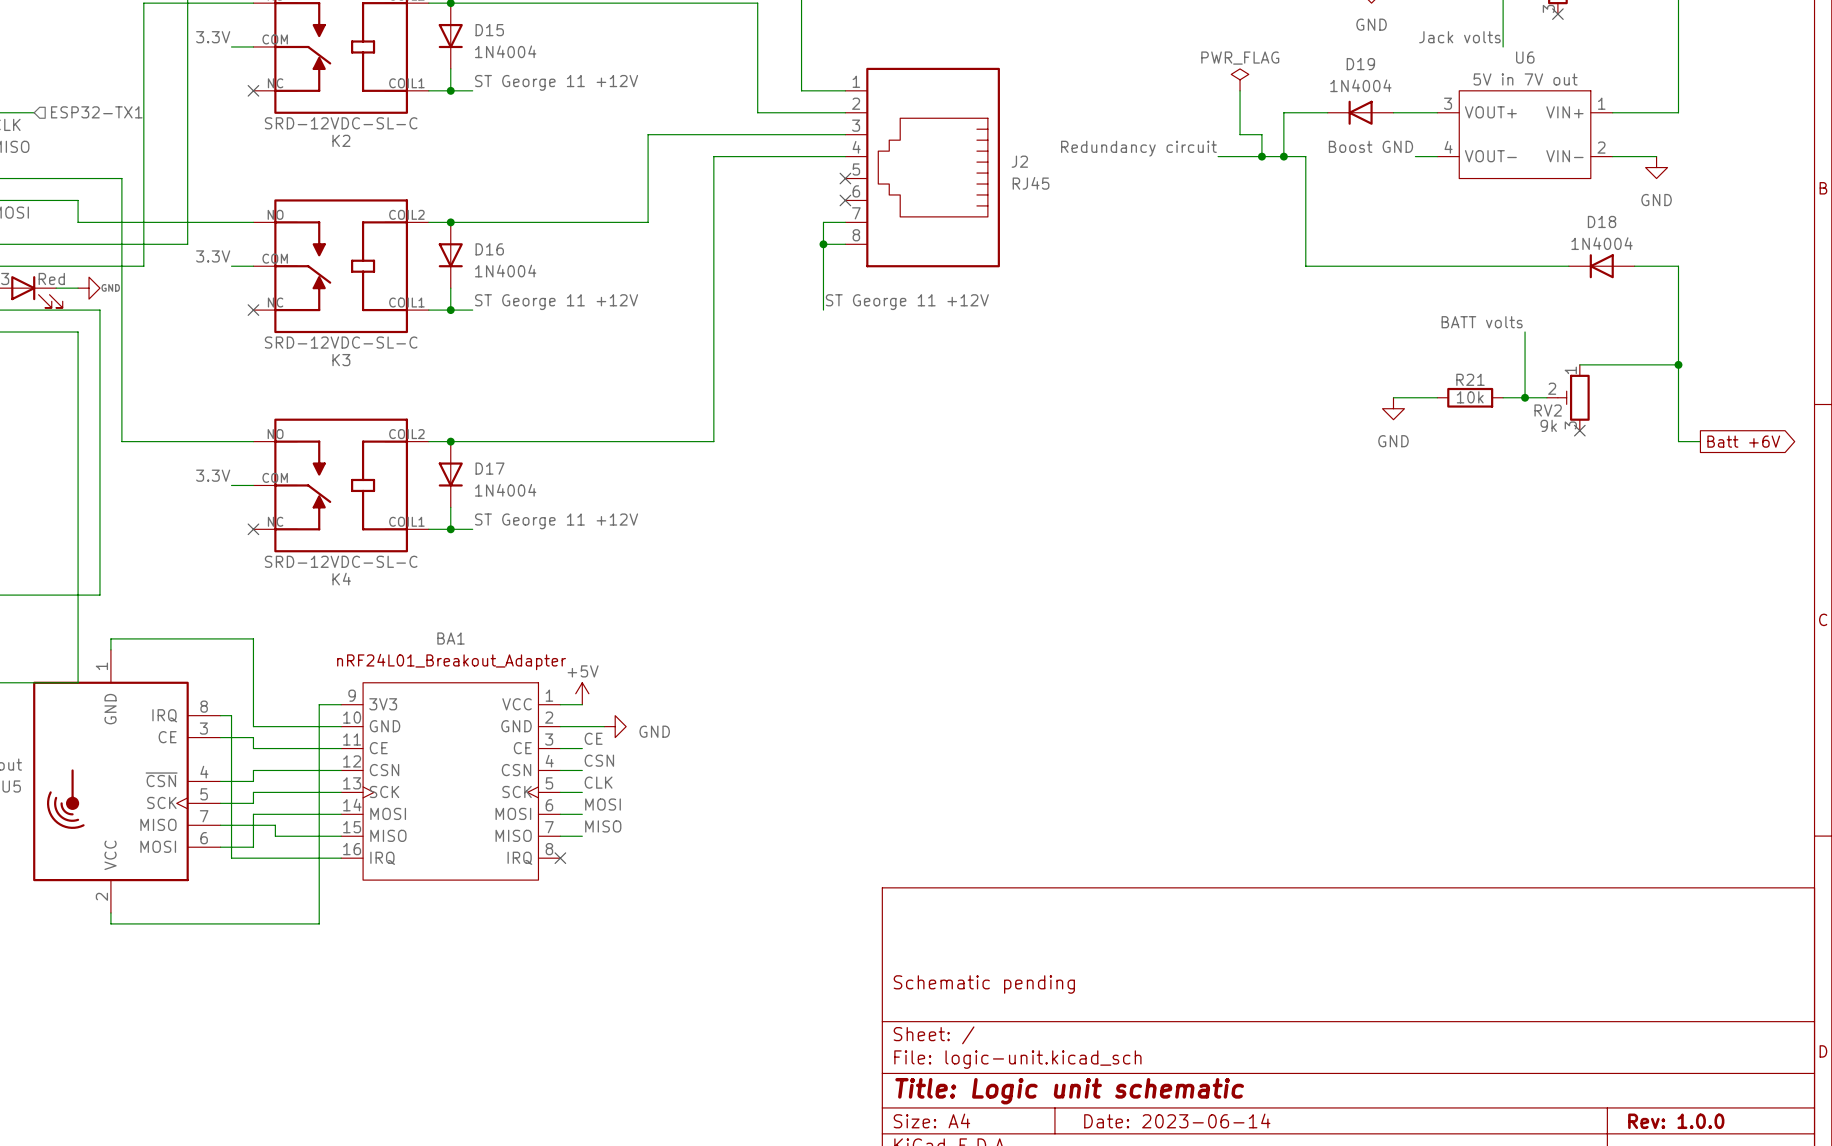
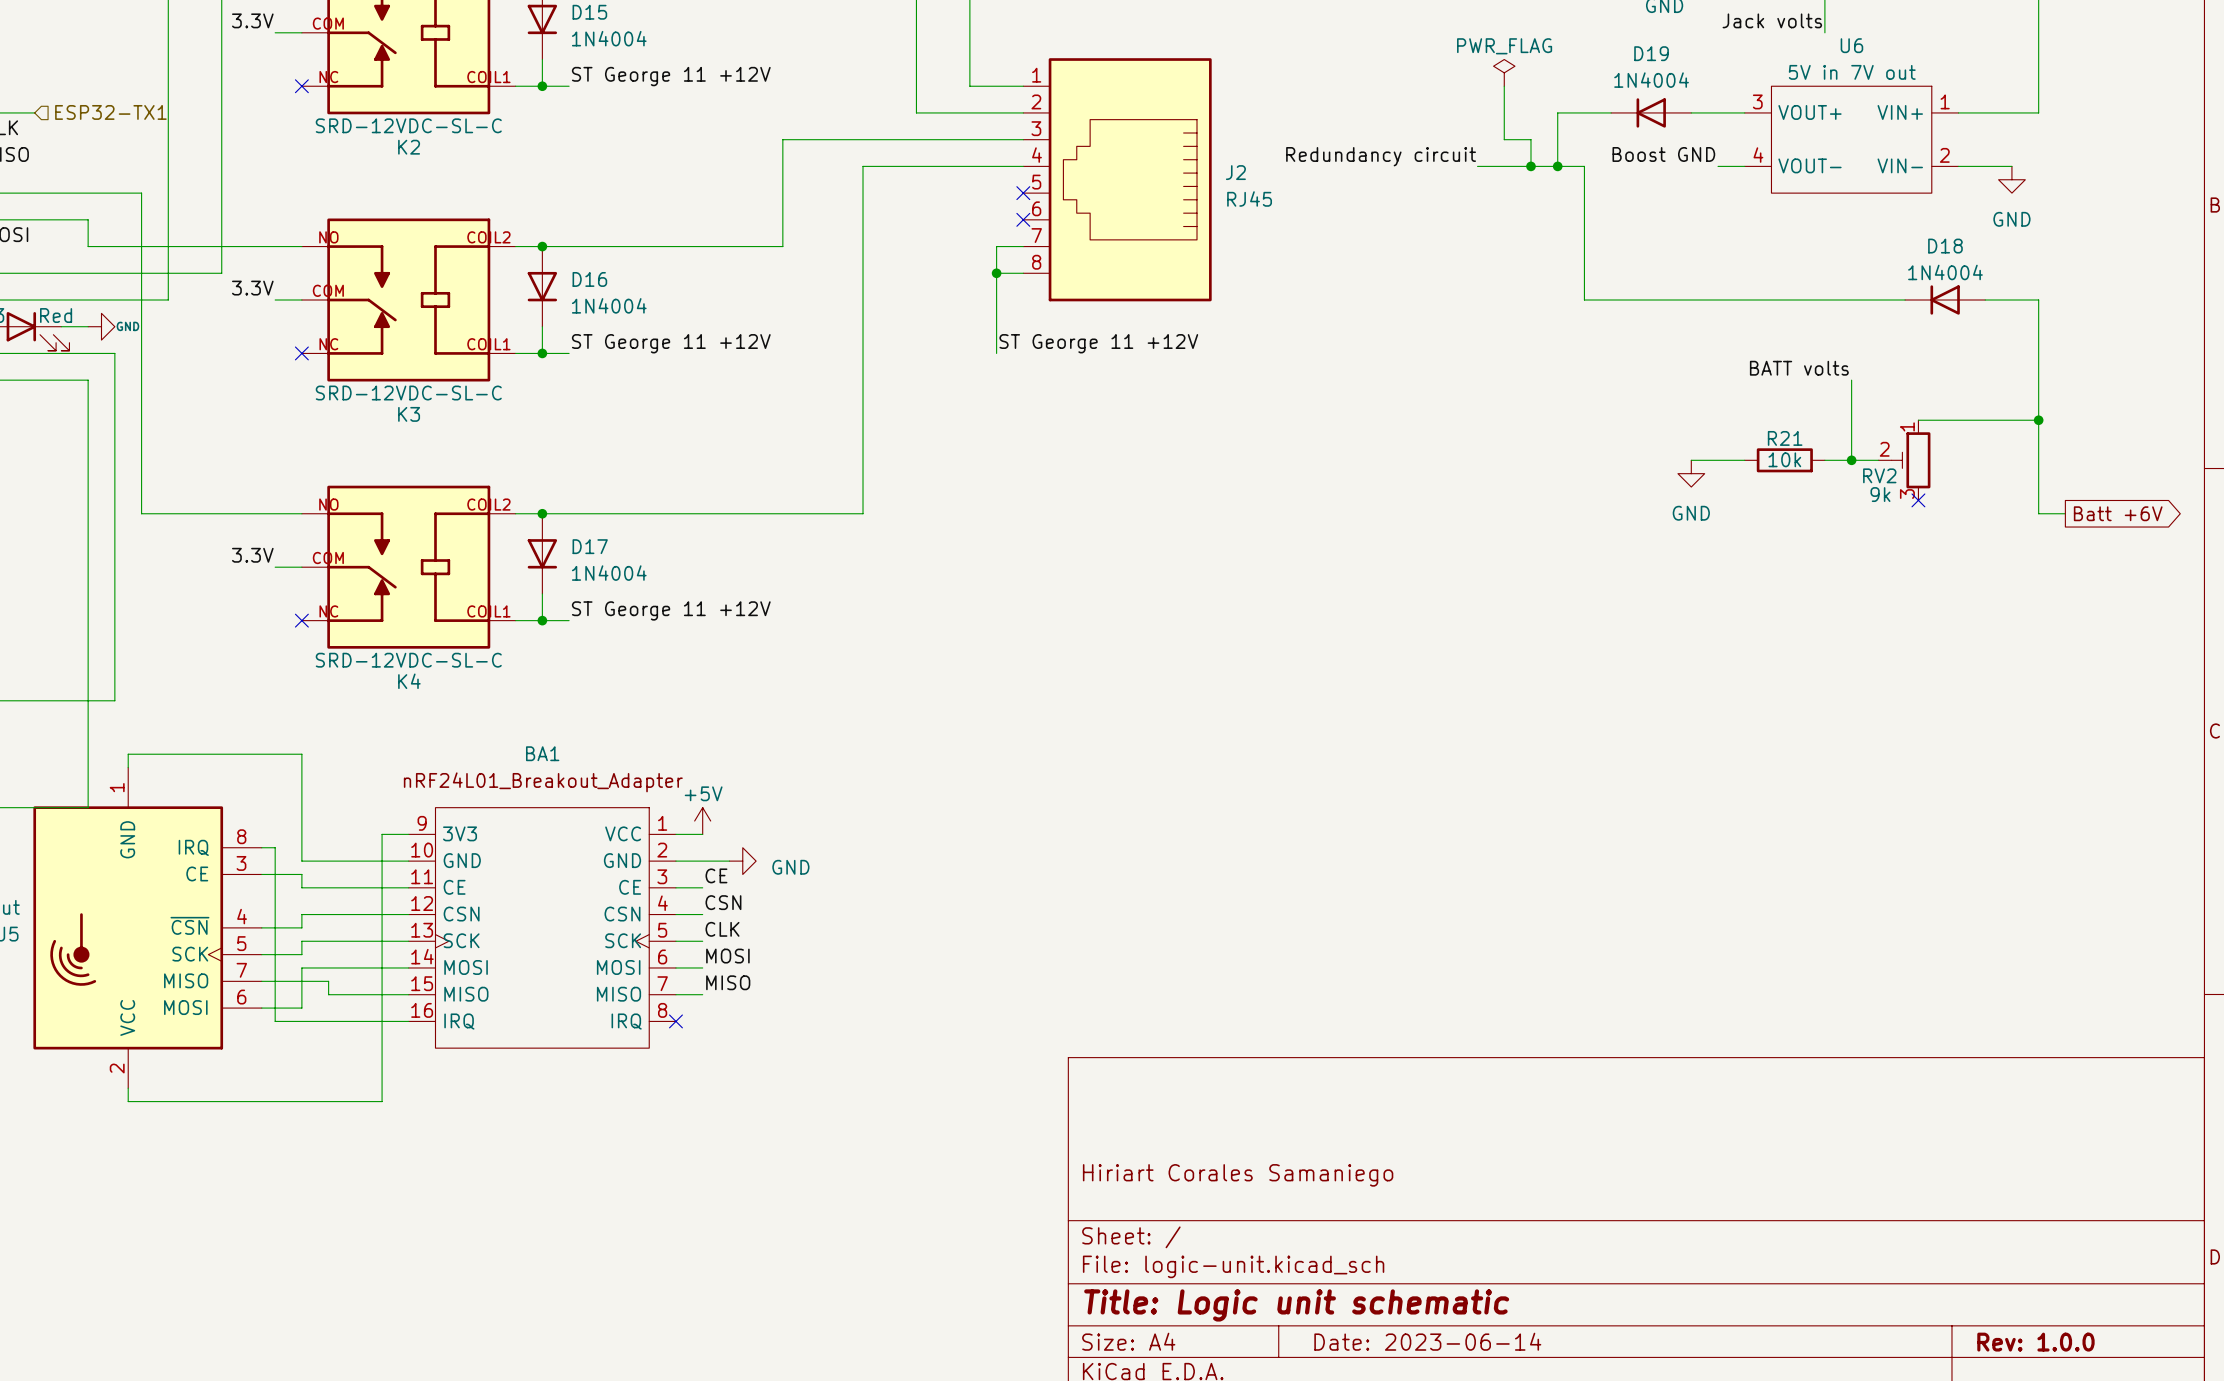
title block: Schematic pending (984, 984) -> Hiriart Corales Samaniego (1238, 1175)

